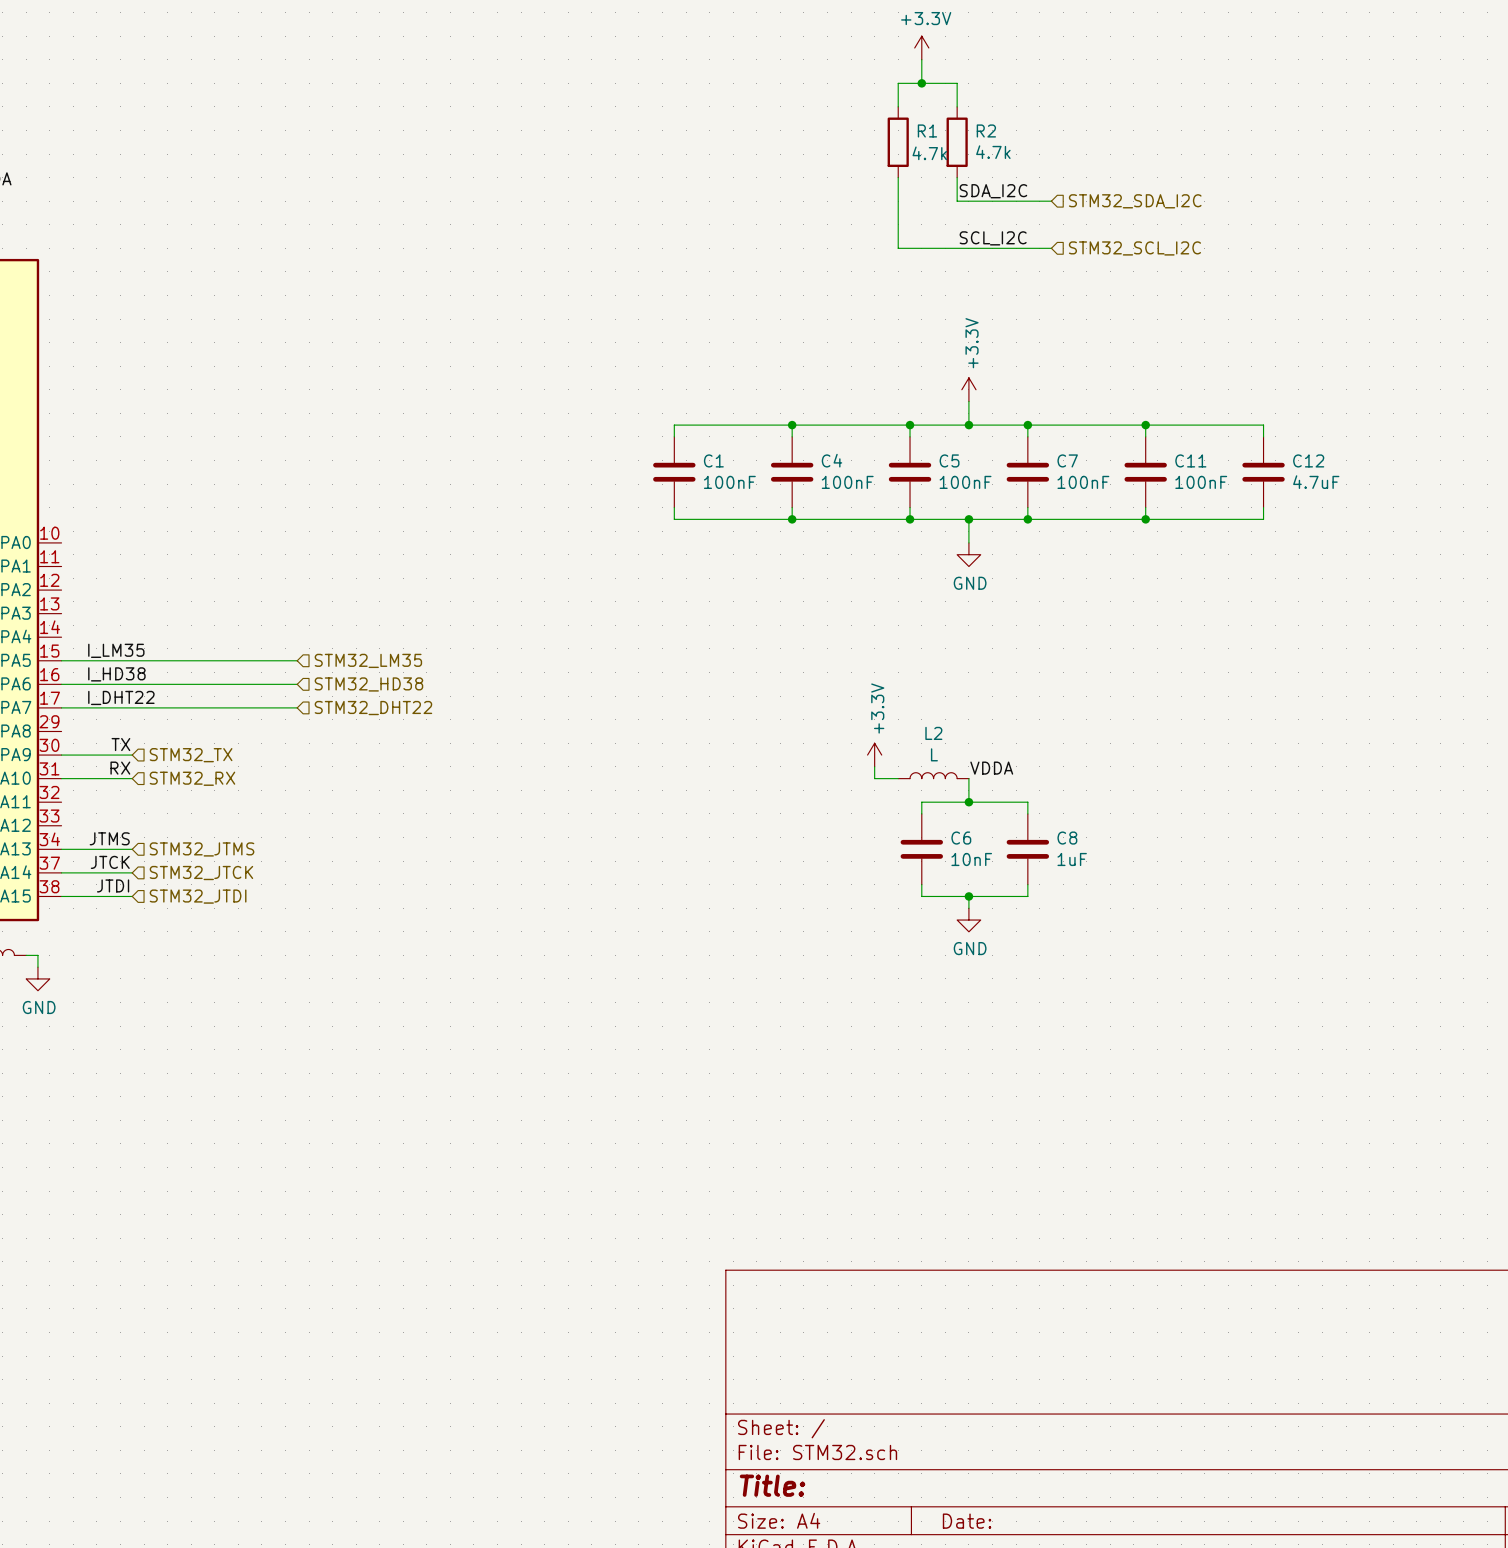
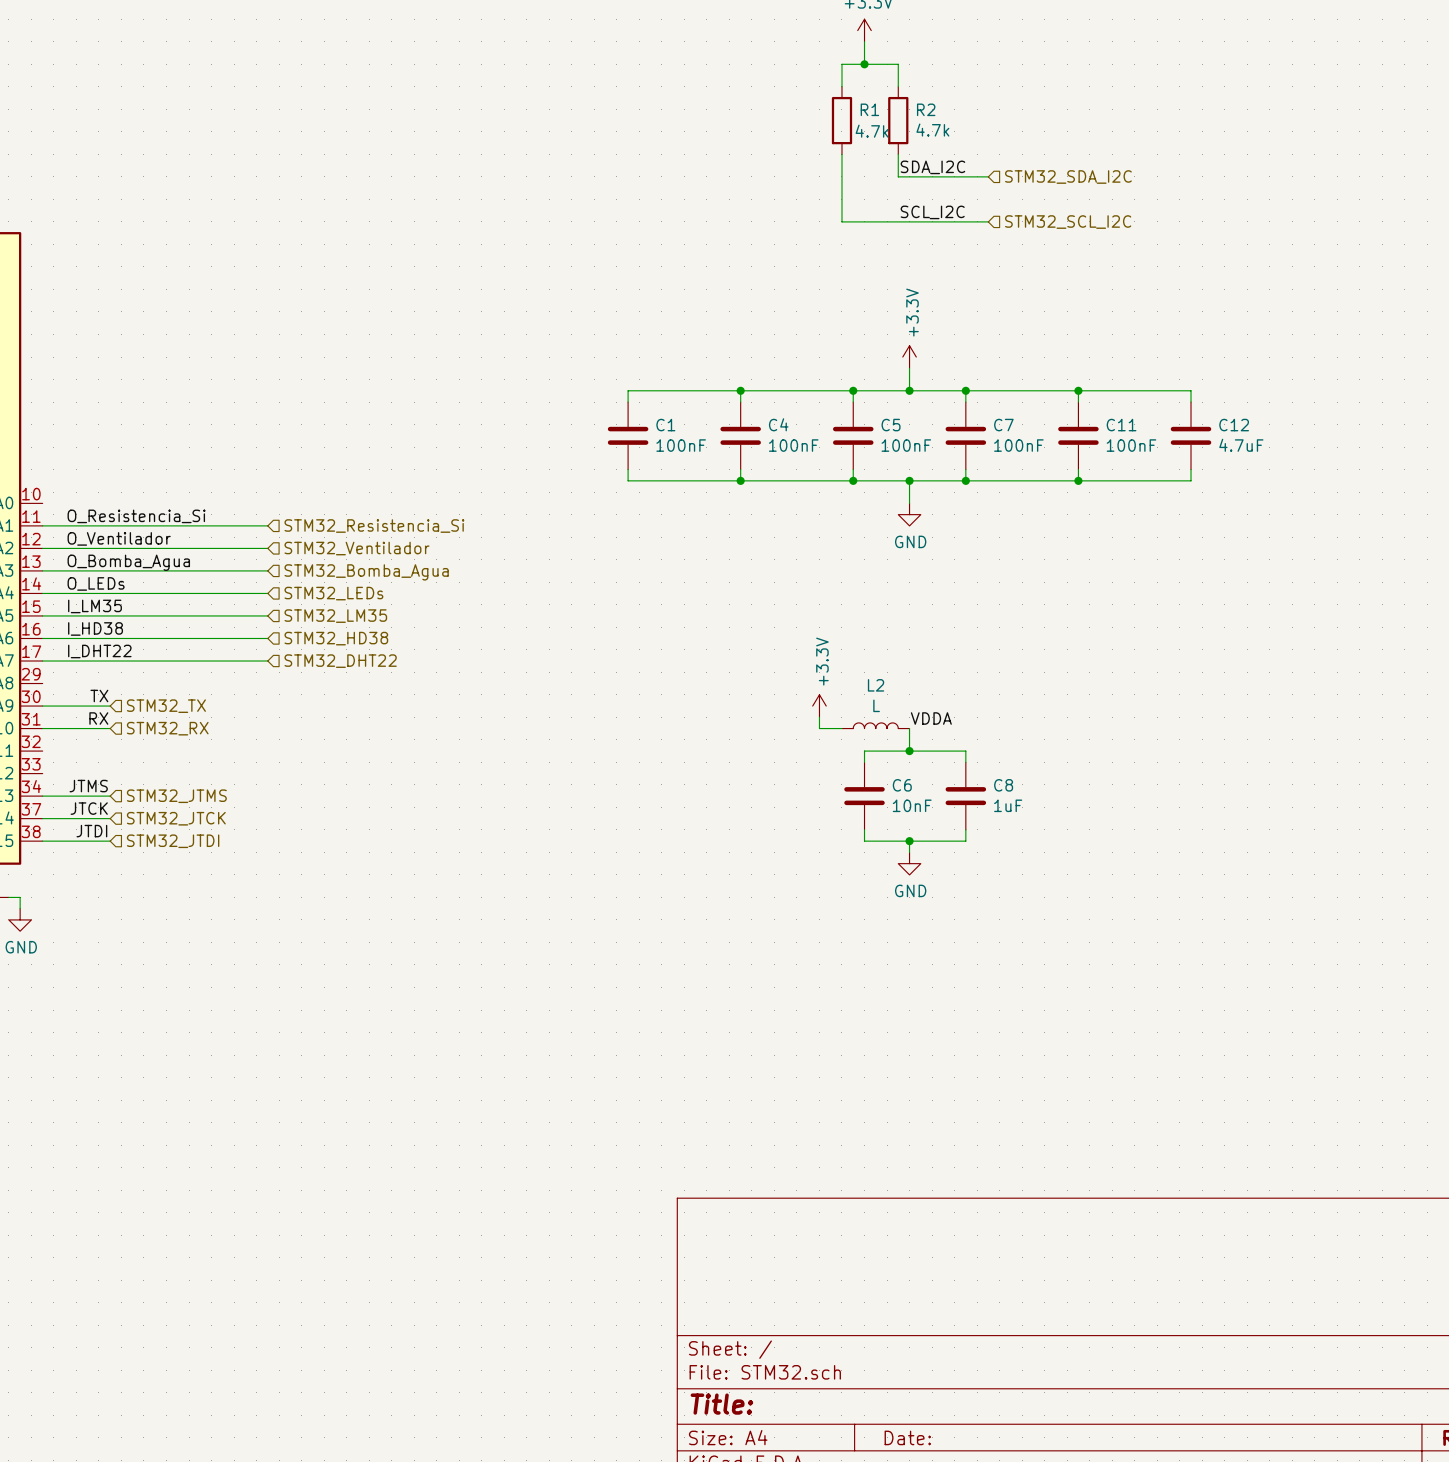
label: none -> O_Resistencia_Si (136, 516)
wire: none -> (42, 525) (267, 525)
hierarchical label: none -> STM32_Resistencia_Si (374, 526)
label: none -> O_Ventilador (119, 538)
wire: none -> (42, 548) (267, 548)
hierarchical label: none -> STM32_Ventilador (356, 548)
label: none -> O_Bomba_Agua (128, 562)
wire: none -> (42, 570) (267, 570)
hierarchical label: none -> STM32_Bomba_Agua (366, 572)
label: none -> O_LEDs (96, 583)
wire: none -> (42, 593) (267, 593)
hierarchical label: none -> STM32_LEDs (333, 593)

